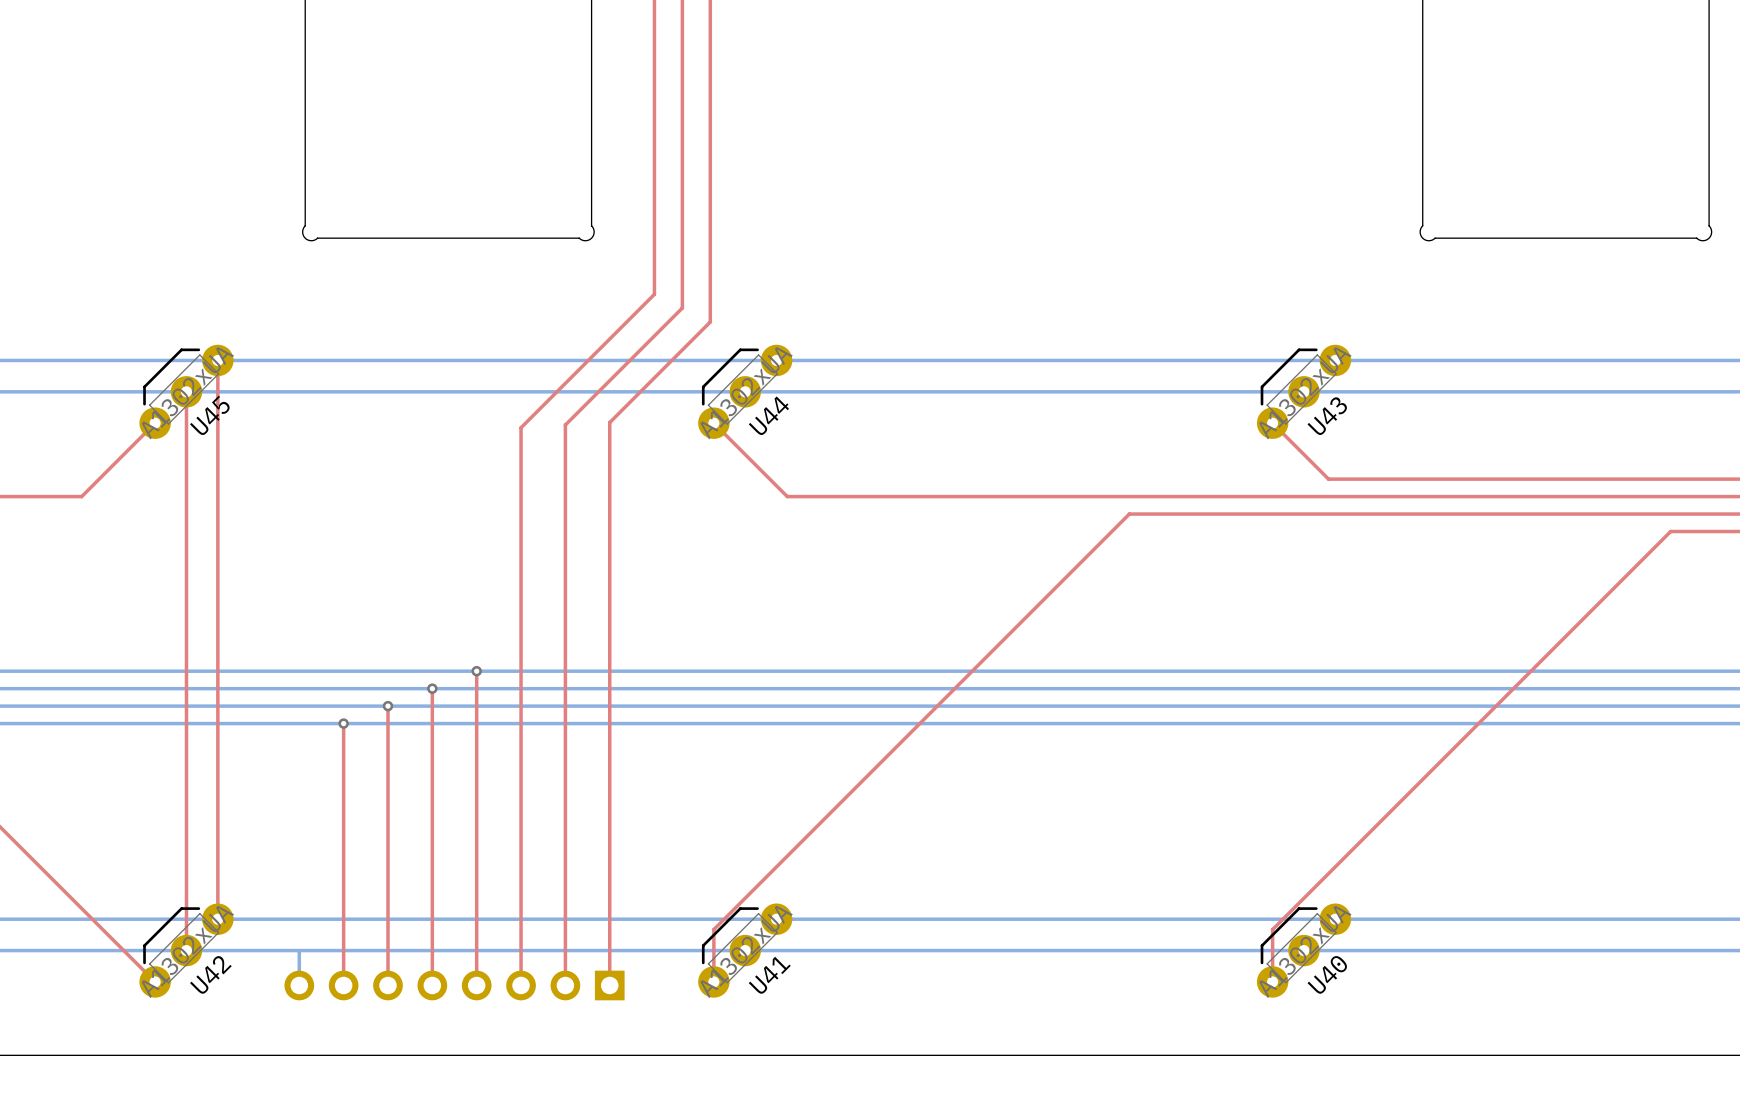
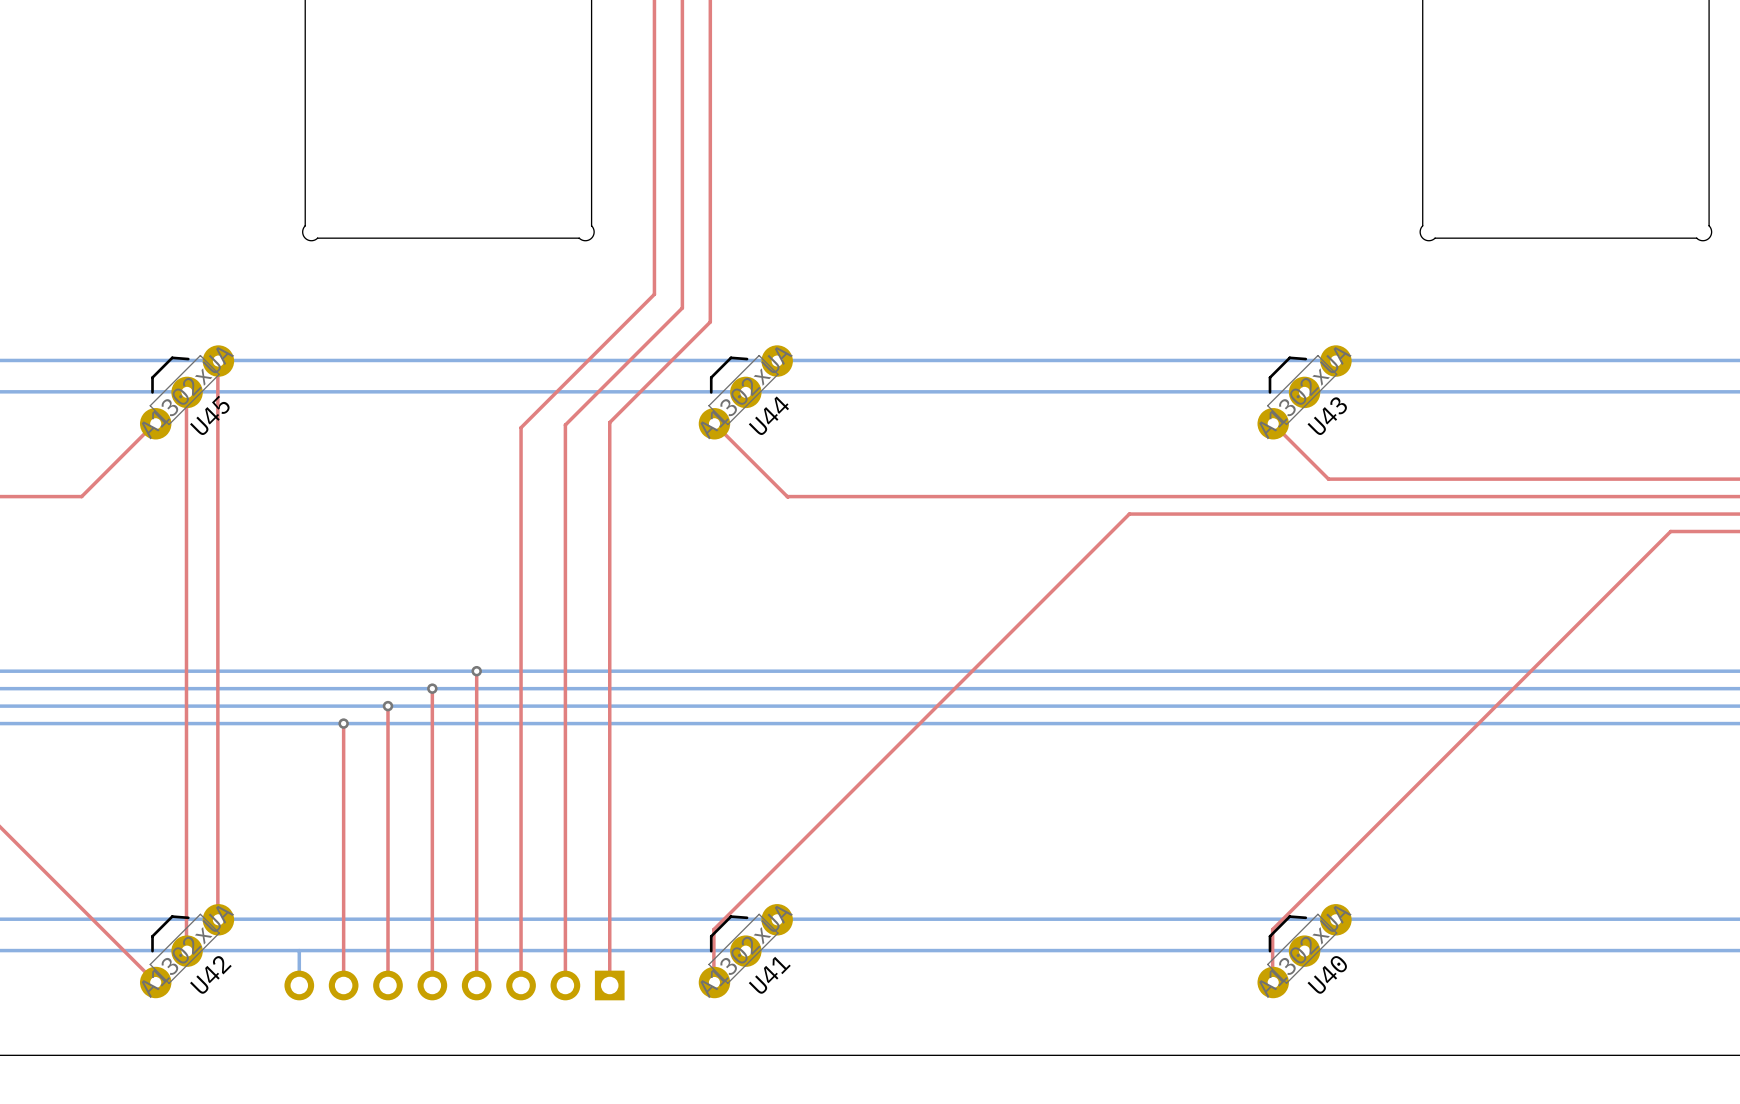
U45 footprint: [139, 344, 234, 439] -> [139, 345, 235, 440]
U44 footprint: [698, 344, 793, 439] -> [698, 345, 793, 440]
U43 footprint: [1256, 344, 1352, 439] -> [1257, 345, 1352, 440]
U42 footprint: [139, 903, 234, 998] -> [139, 904, 235, 999]
U41 footprint: [698, 903, 793, 998] -> [698, 904, 793, 999]
U40 footprint: [1256, 903, 1352, 998] -> [1257, 904, 1352, 999]

